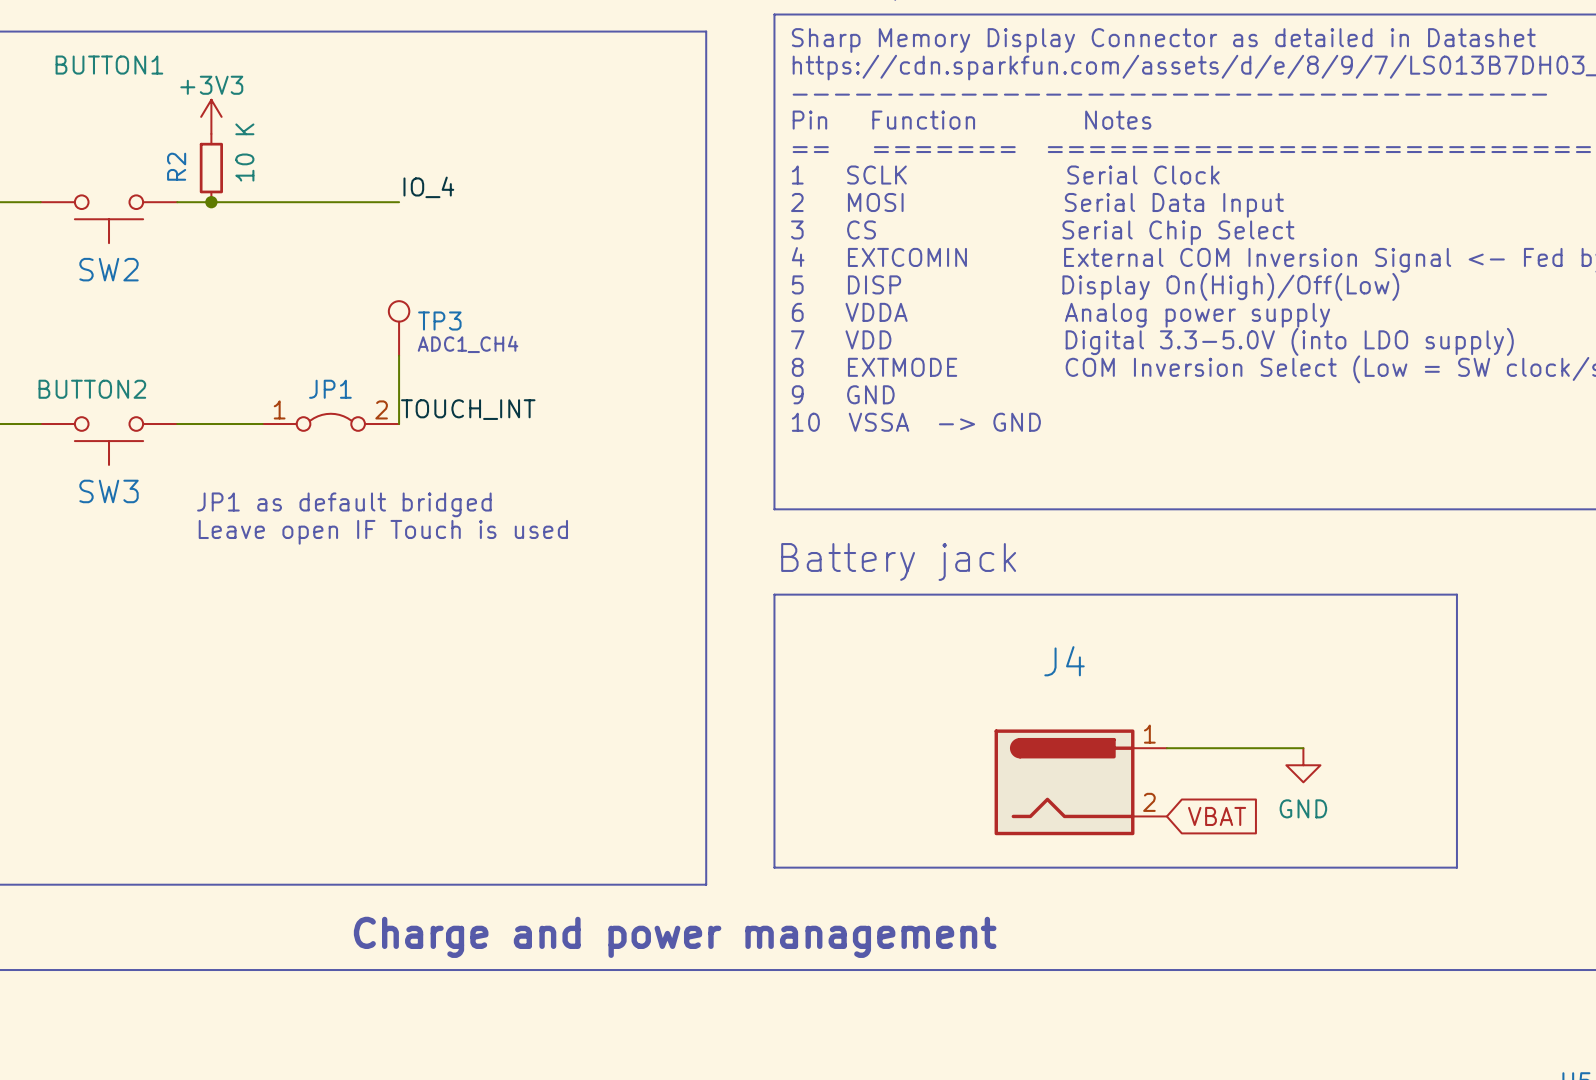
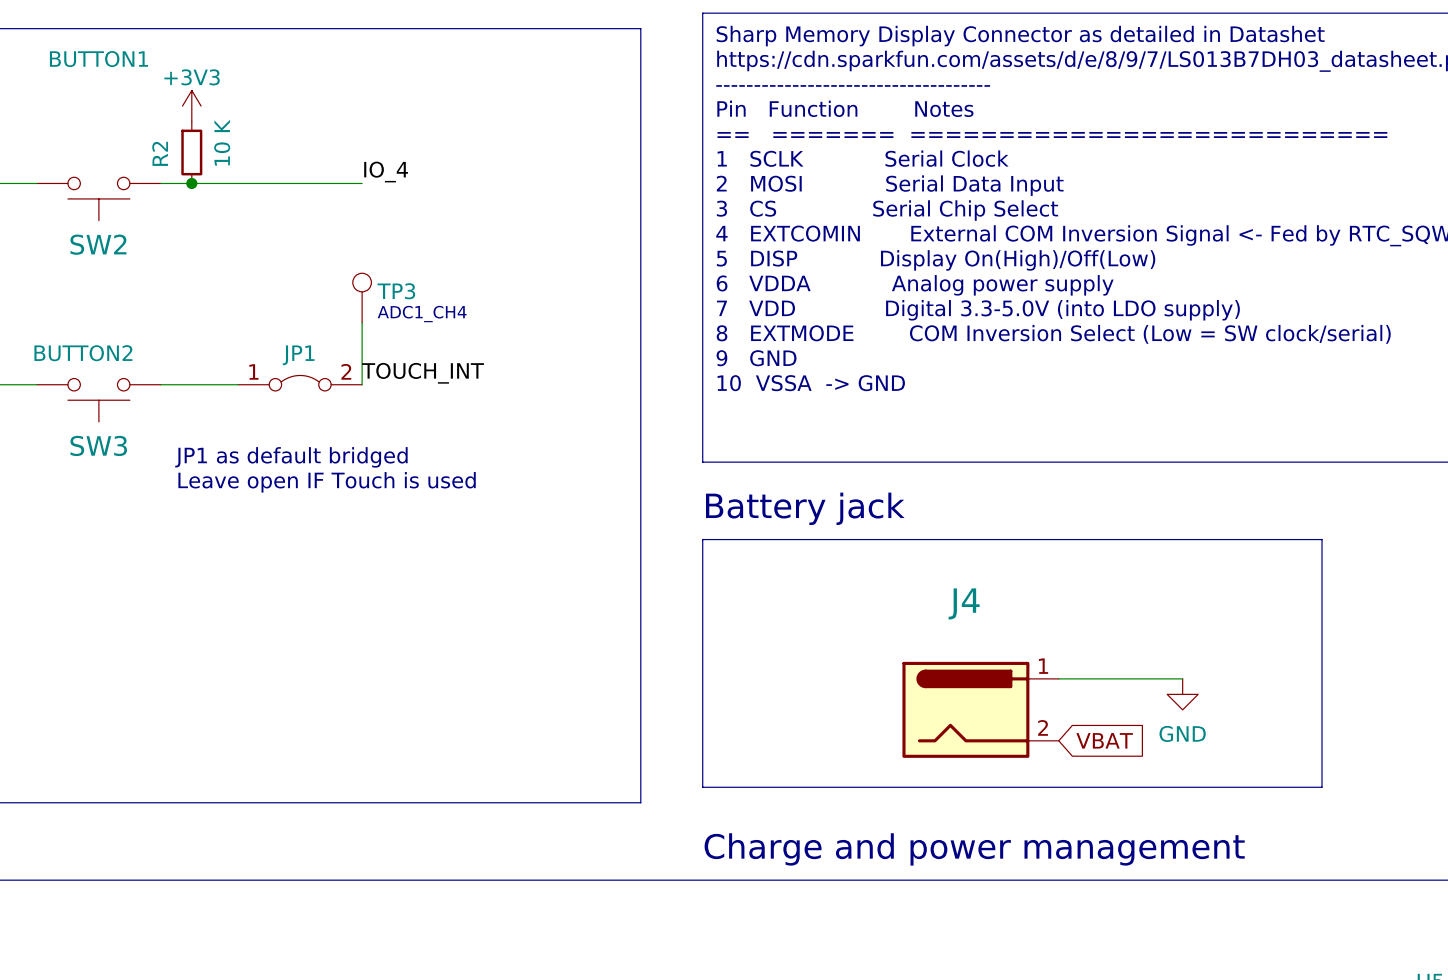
text: Charge and power management (675, 937) -> none
text: none -> Charge and power management (974, 849)

